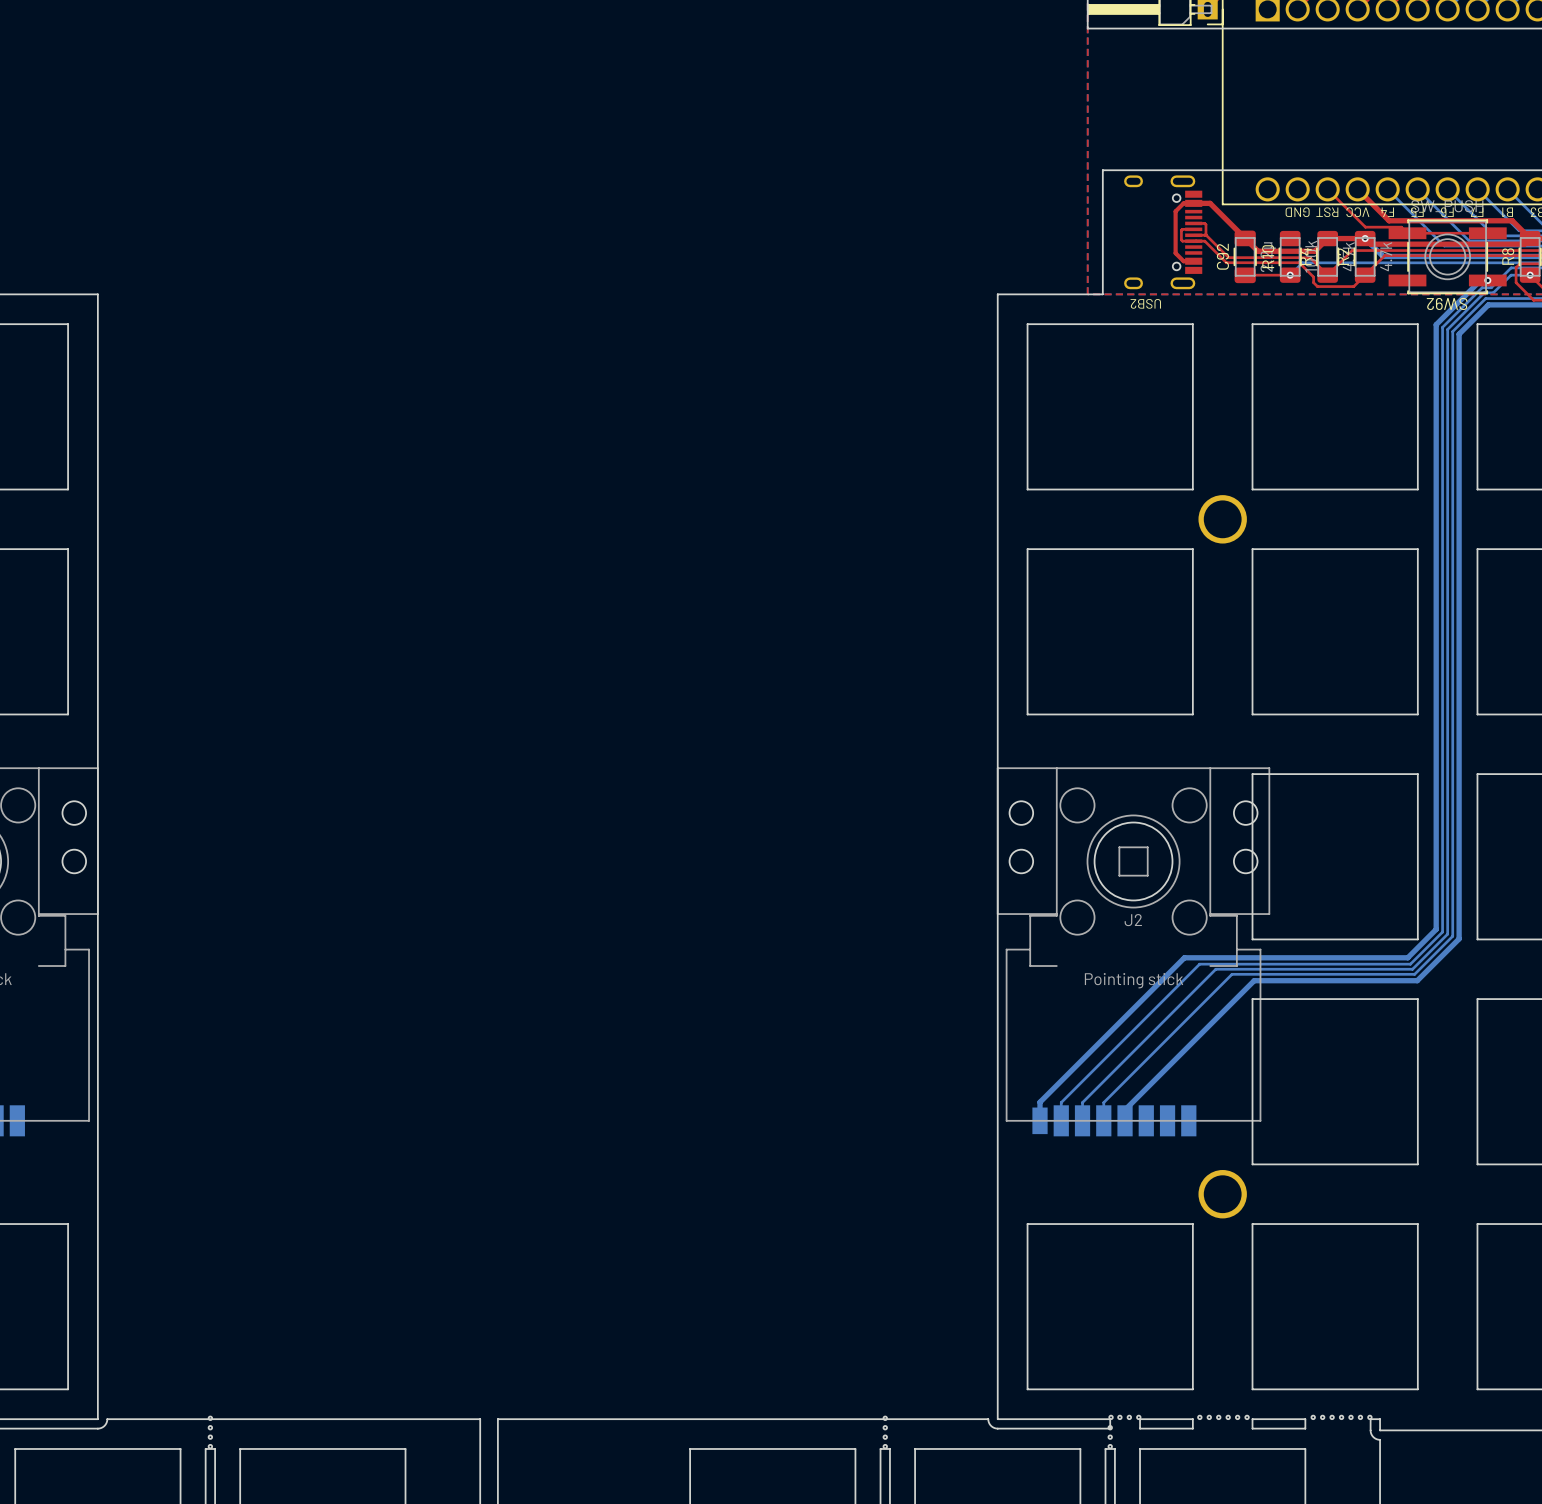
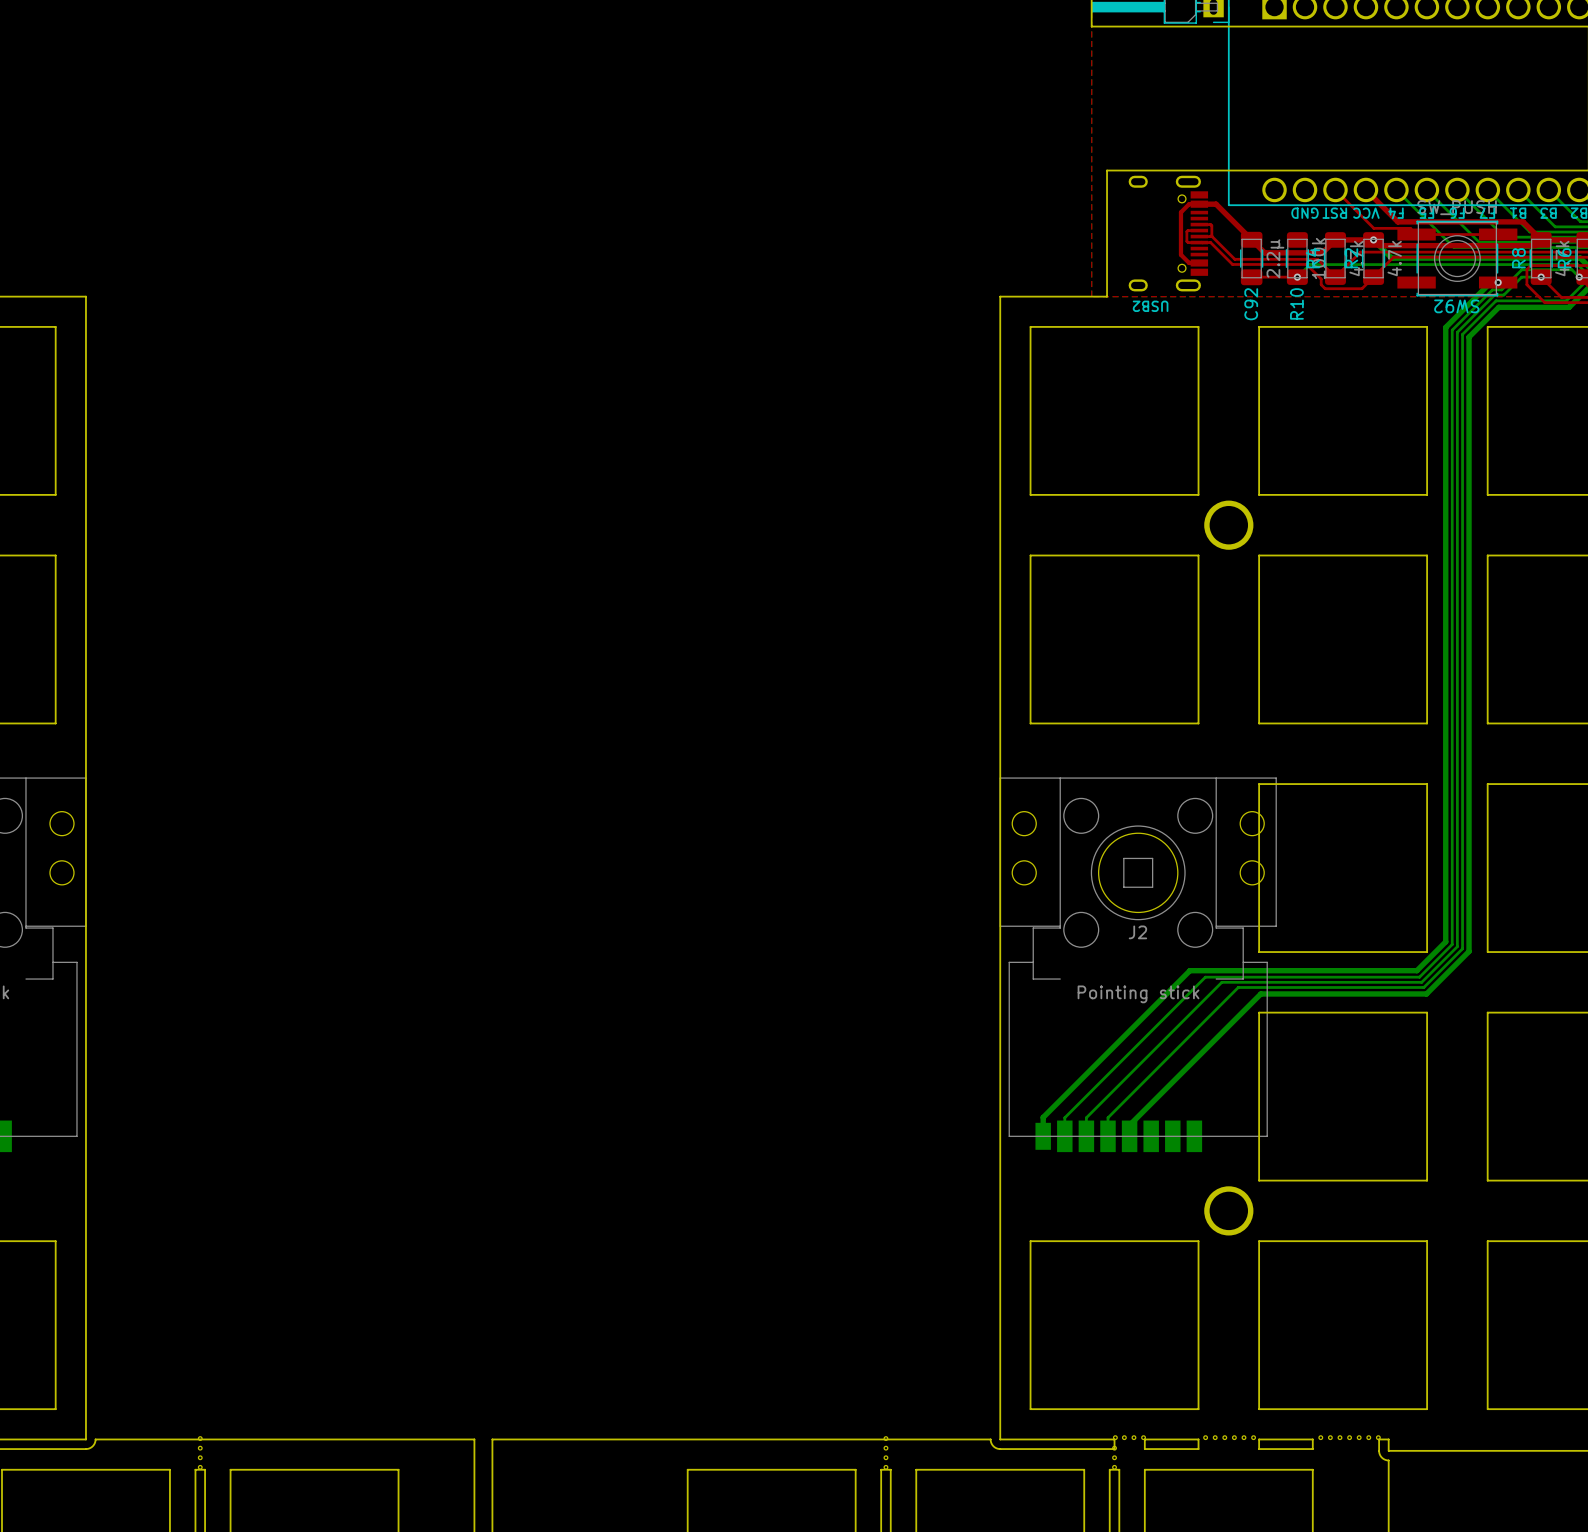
C92 name position: C92 (1222, 256) -> C92 (1251, 304)
R10 name position: R10 (1268, 256) -> R10 (1296, 303)

